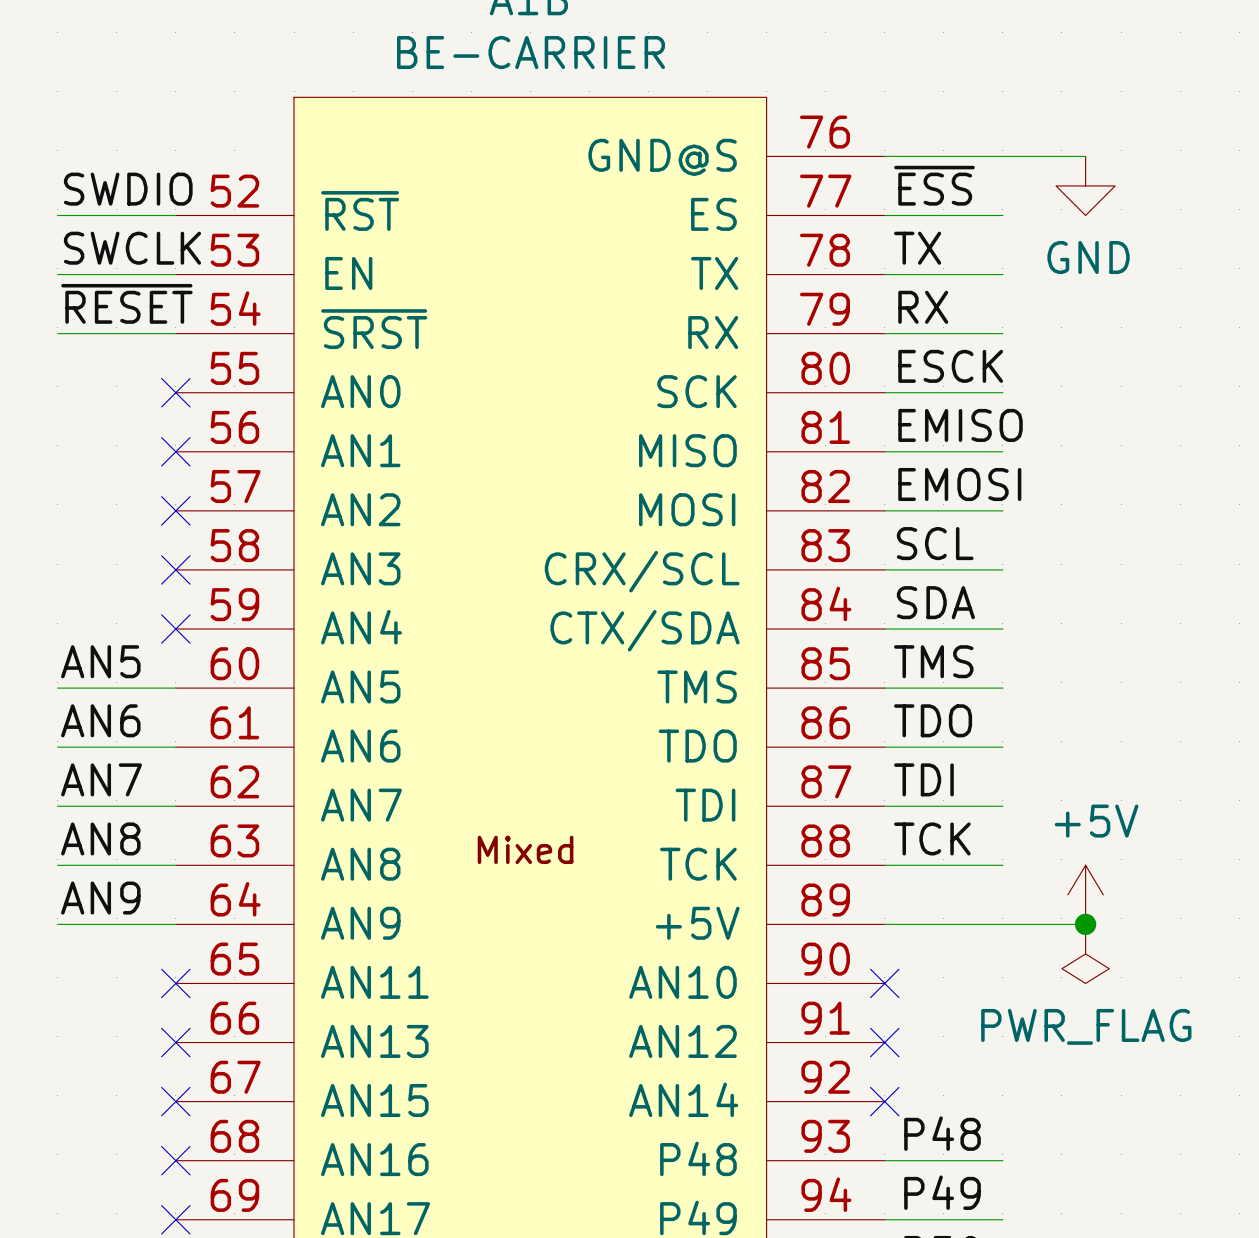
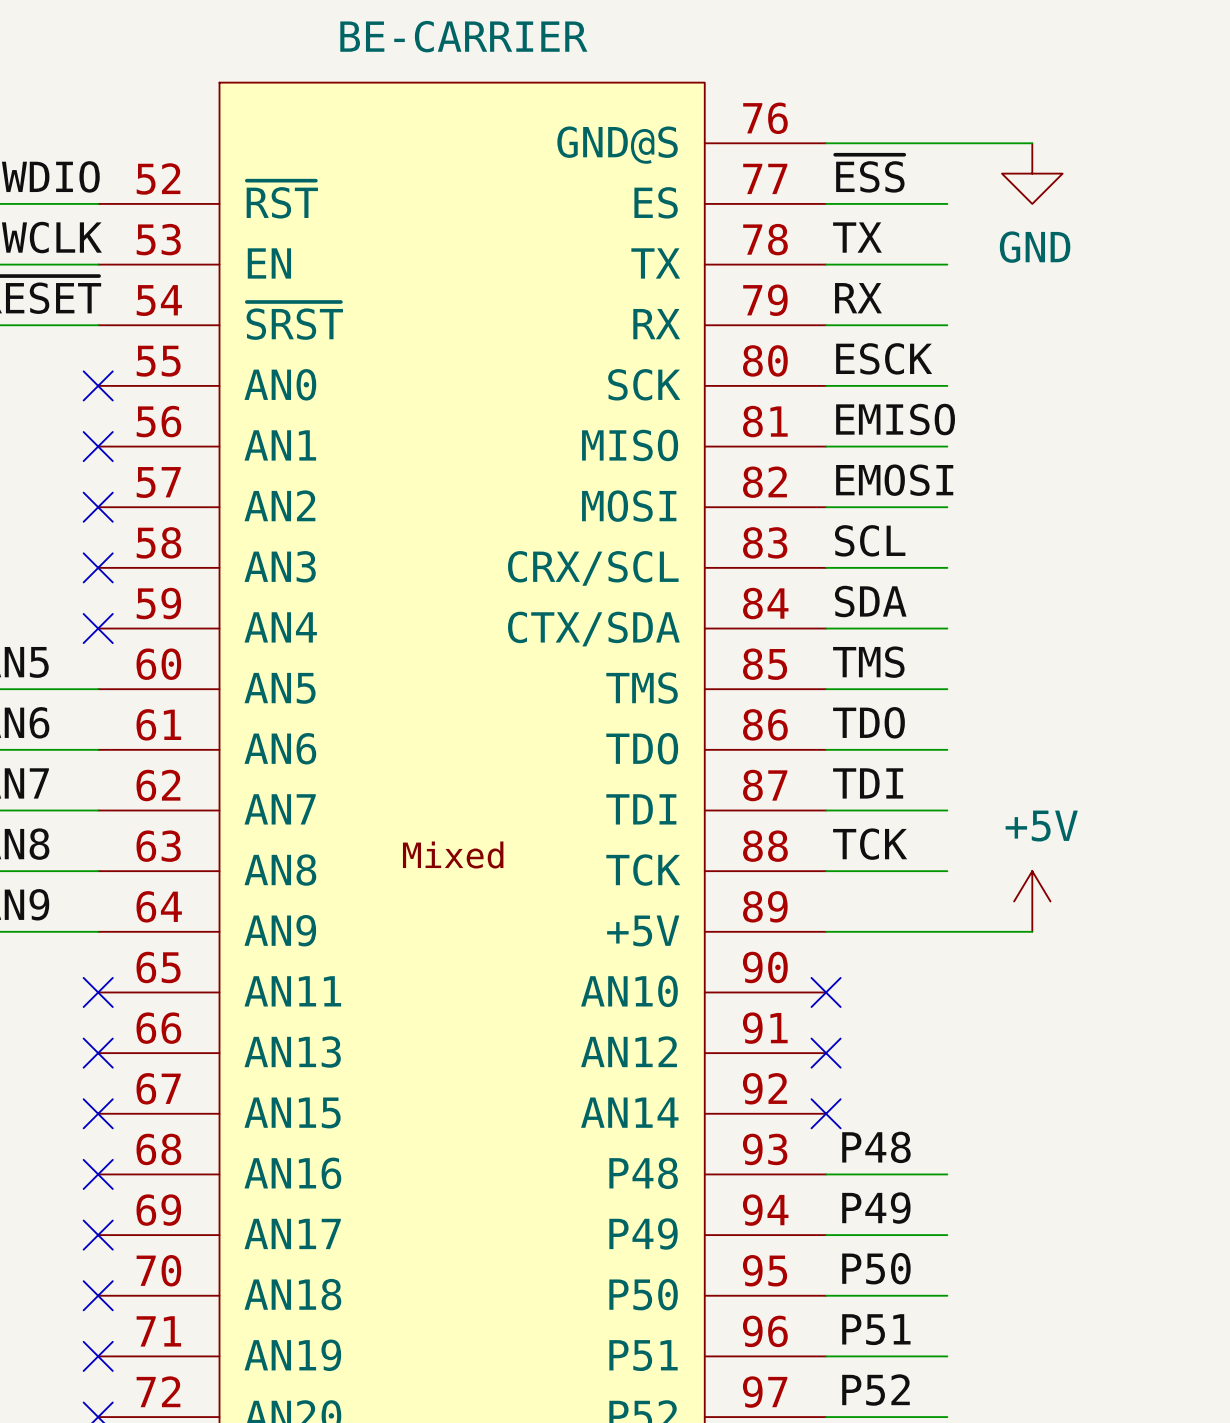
junction: (1085, 924) -> none
power symbol: PWR_FLAG (1085, 953) -> none

